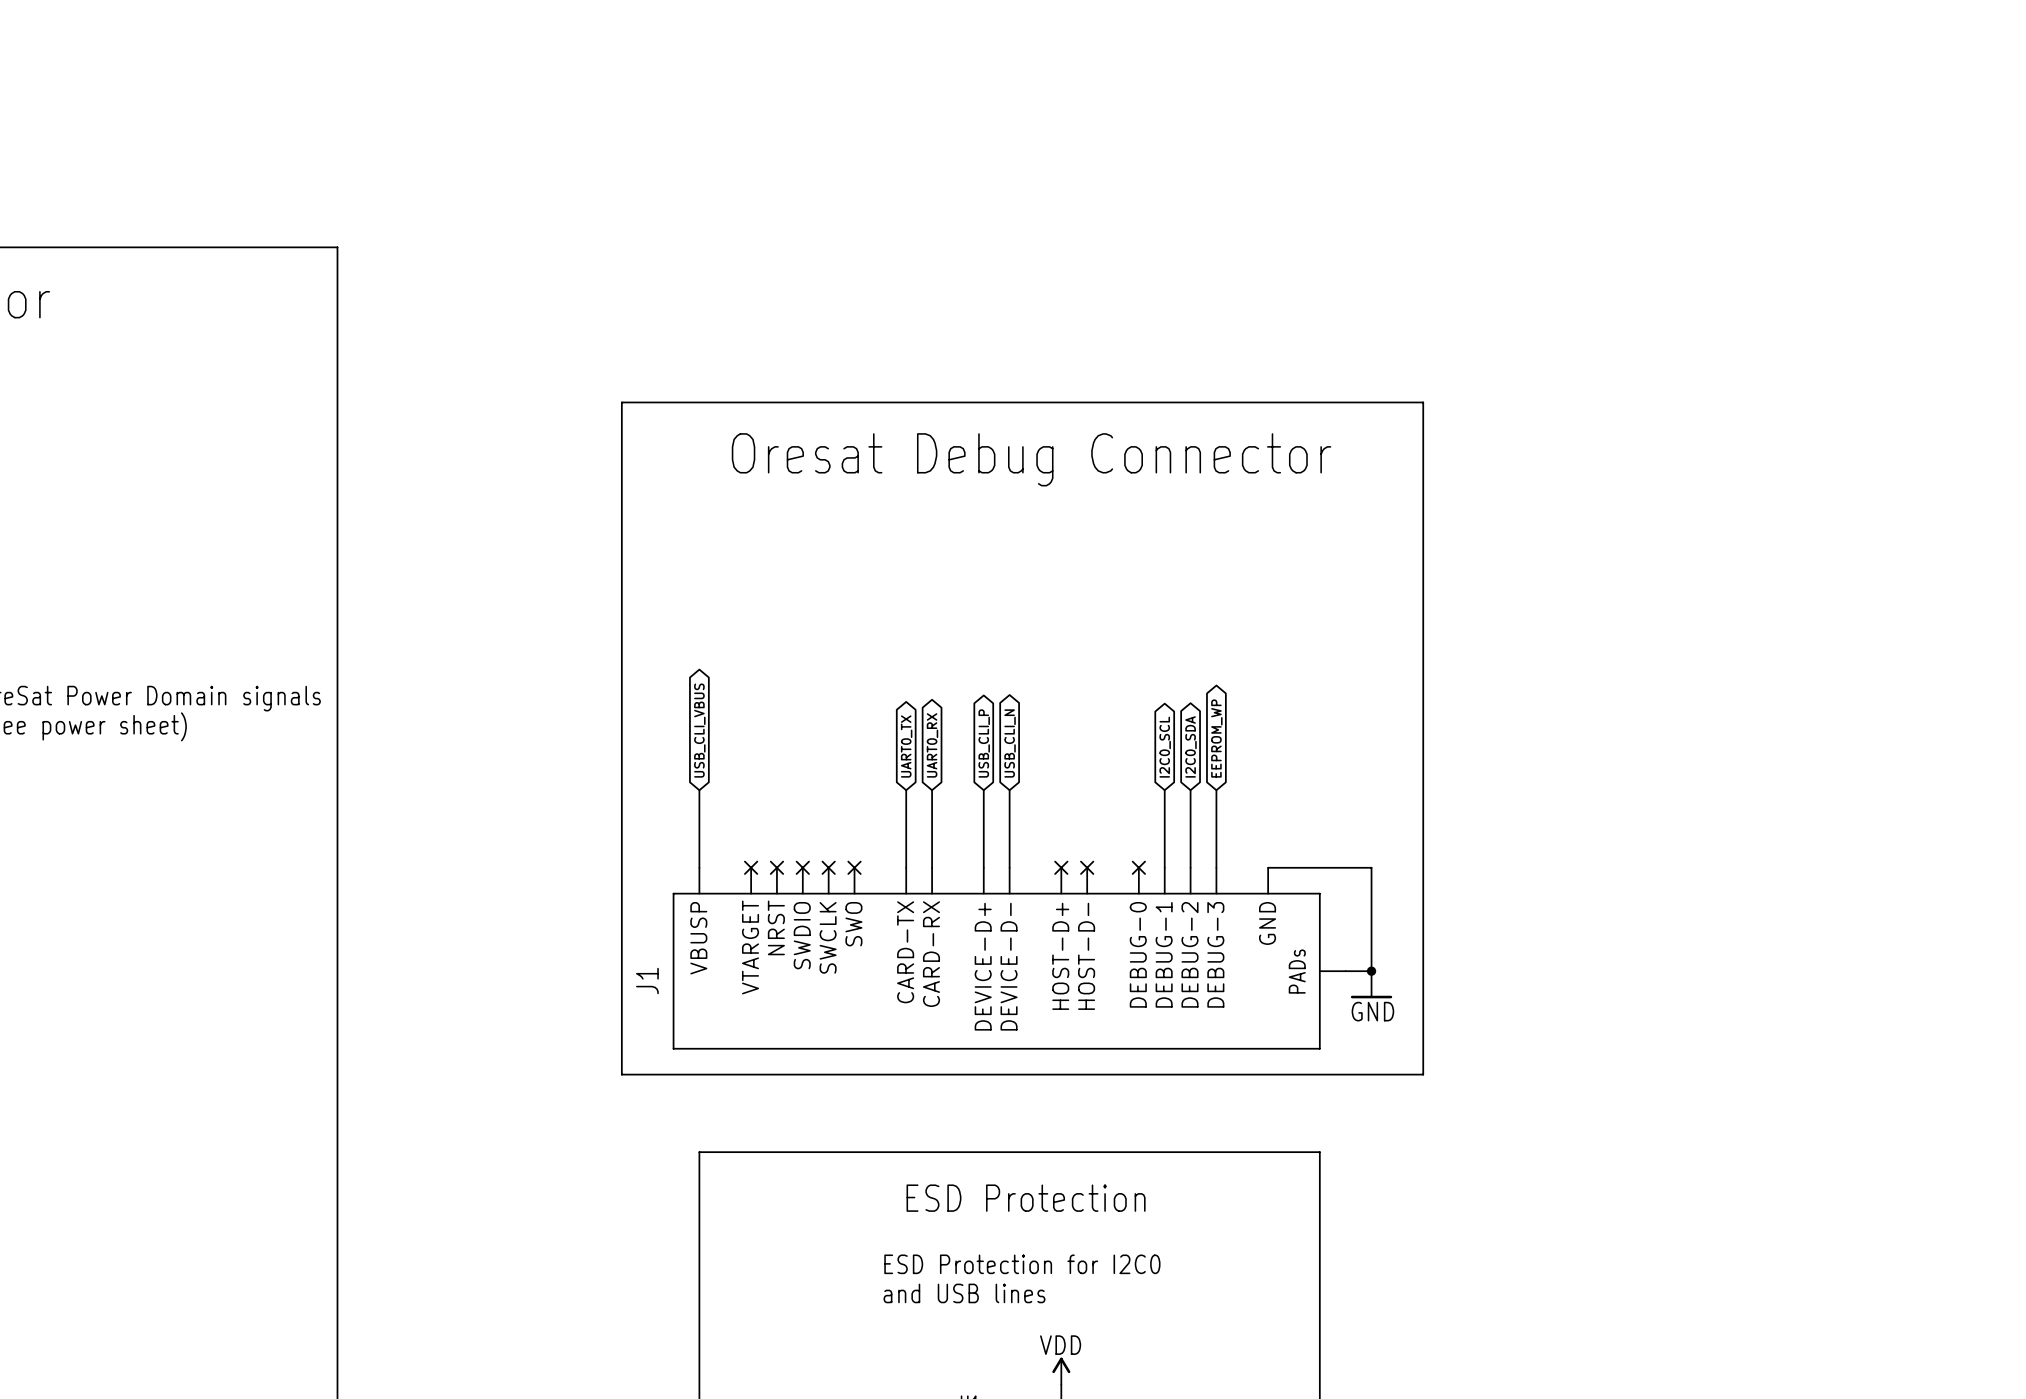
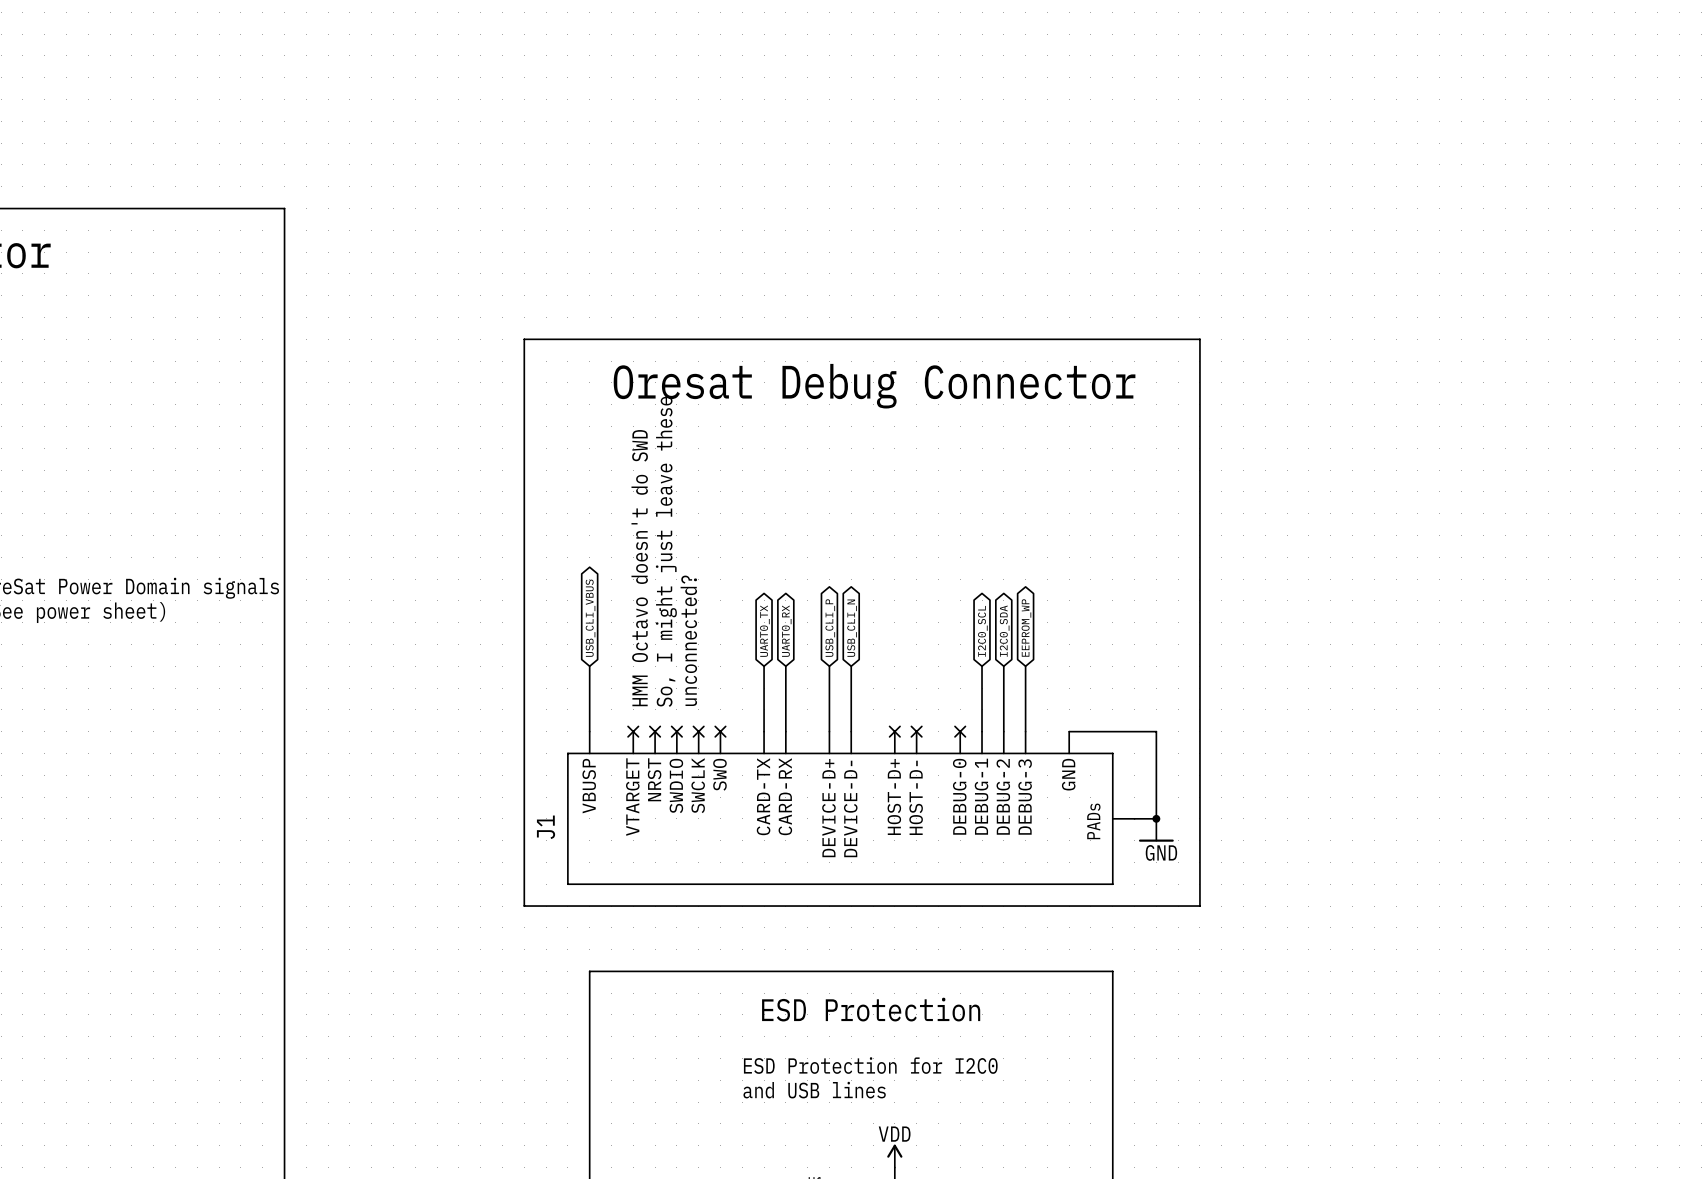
text: none -> HMM Octavo doesn't do SWD (639, 568)
text: none -> So, I might just leave these (666, 551)
text: none -> unconnected? (688, 640)

